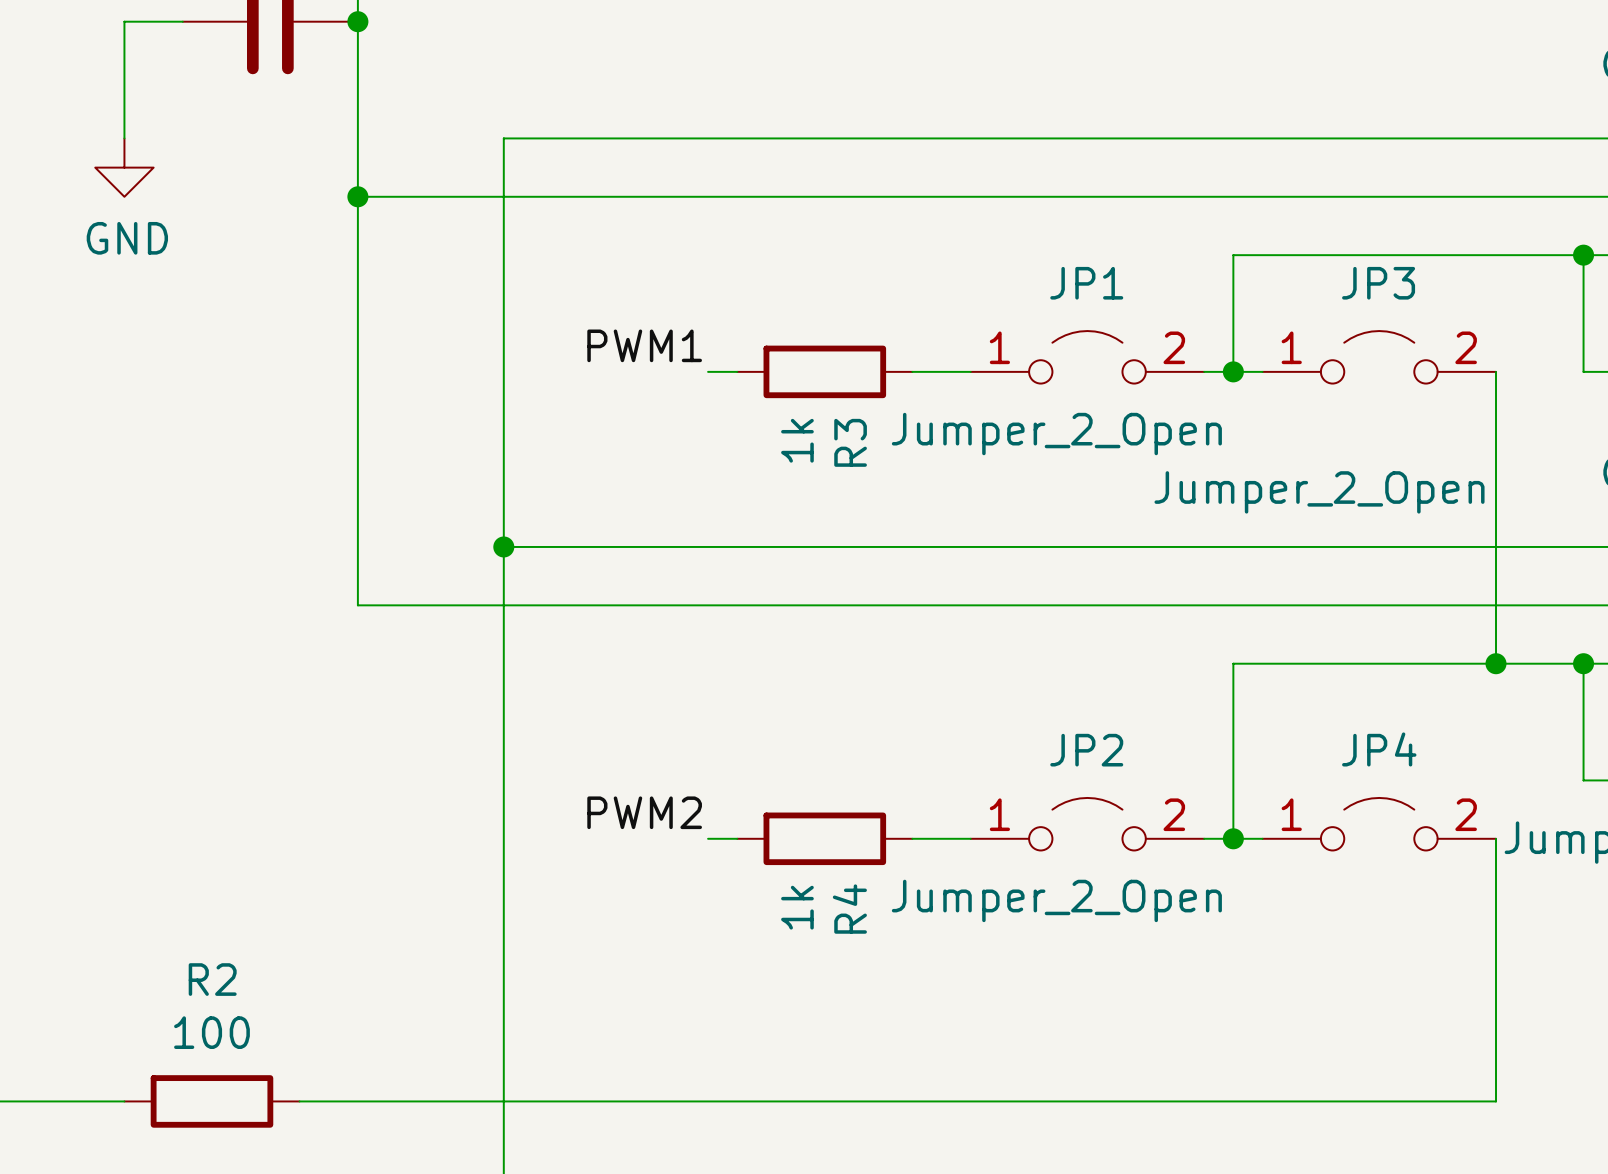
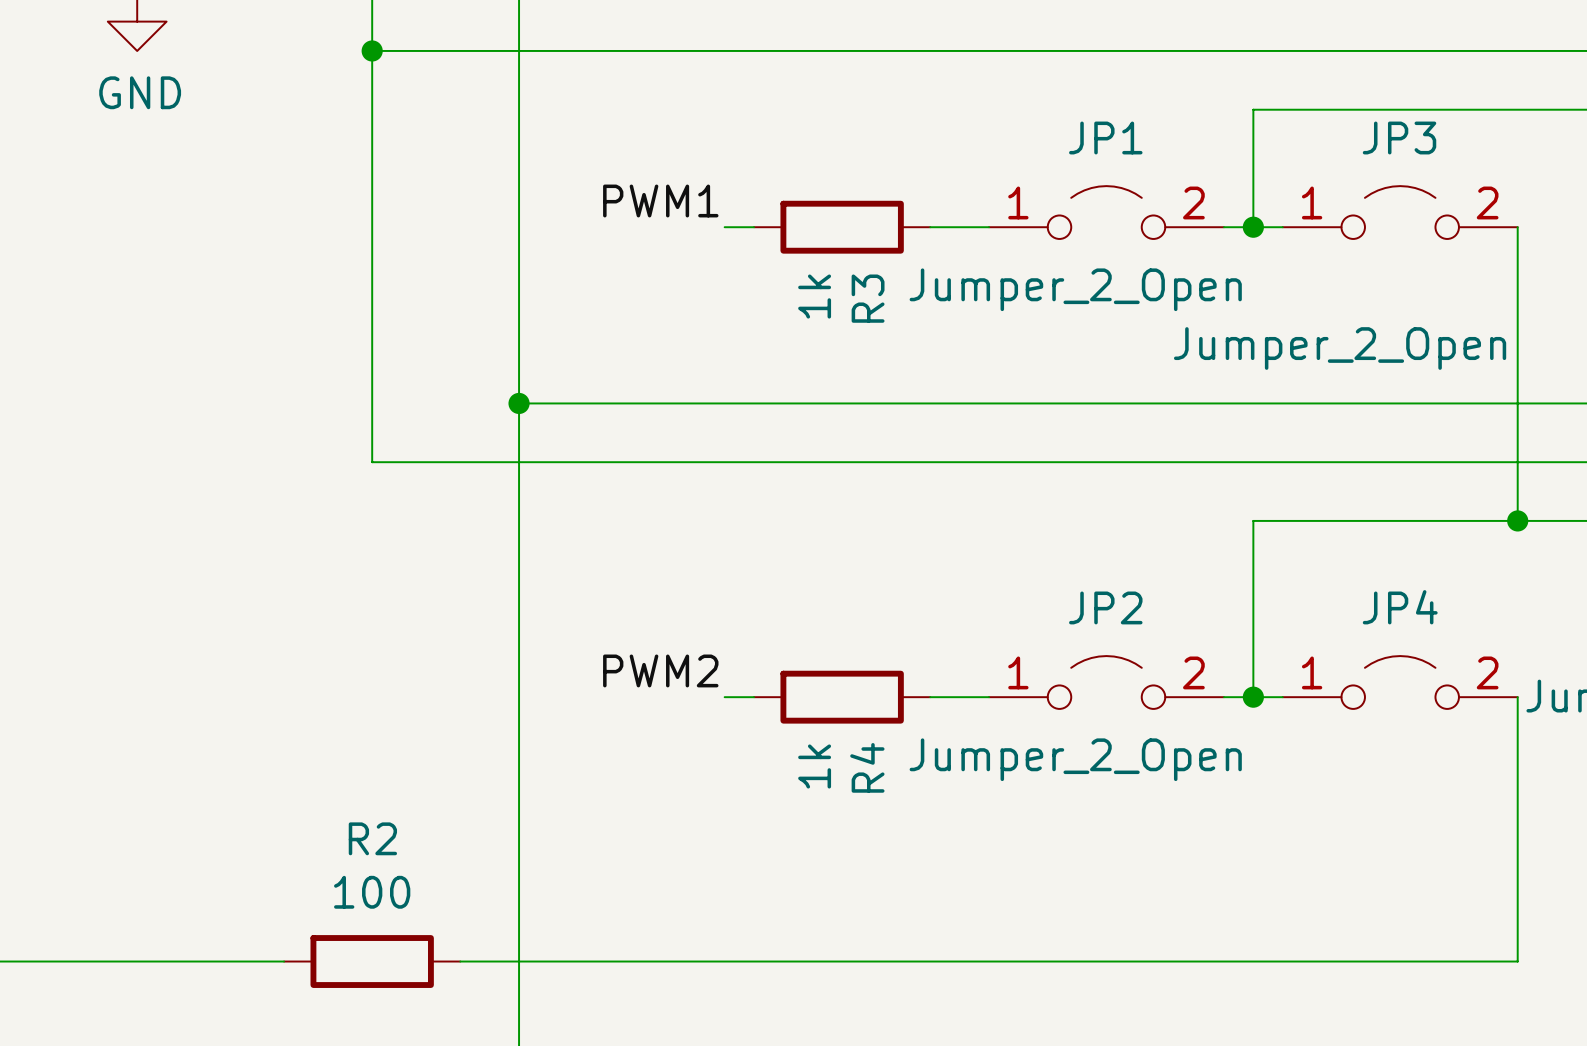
R2 position: (211, 1101) -> (372, 961)
wire: (299, 1101) (445, 1101) -> (137, 961) (284, 961)

